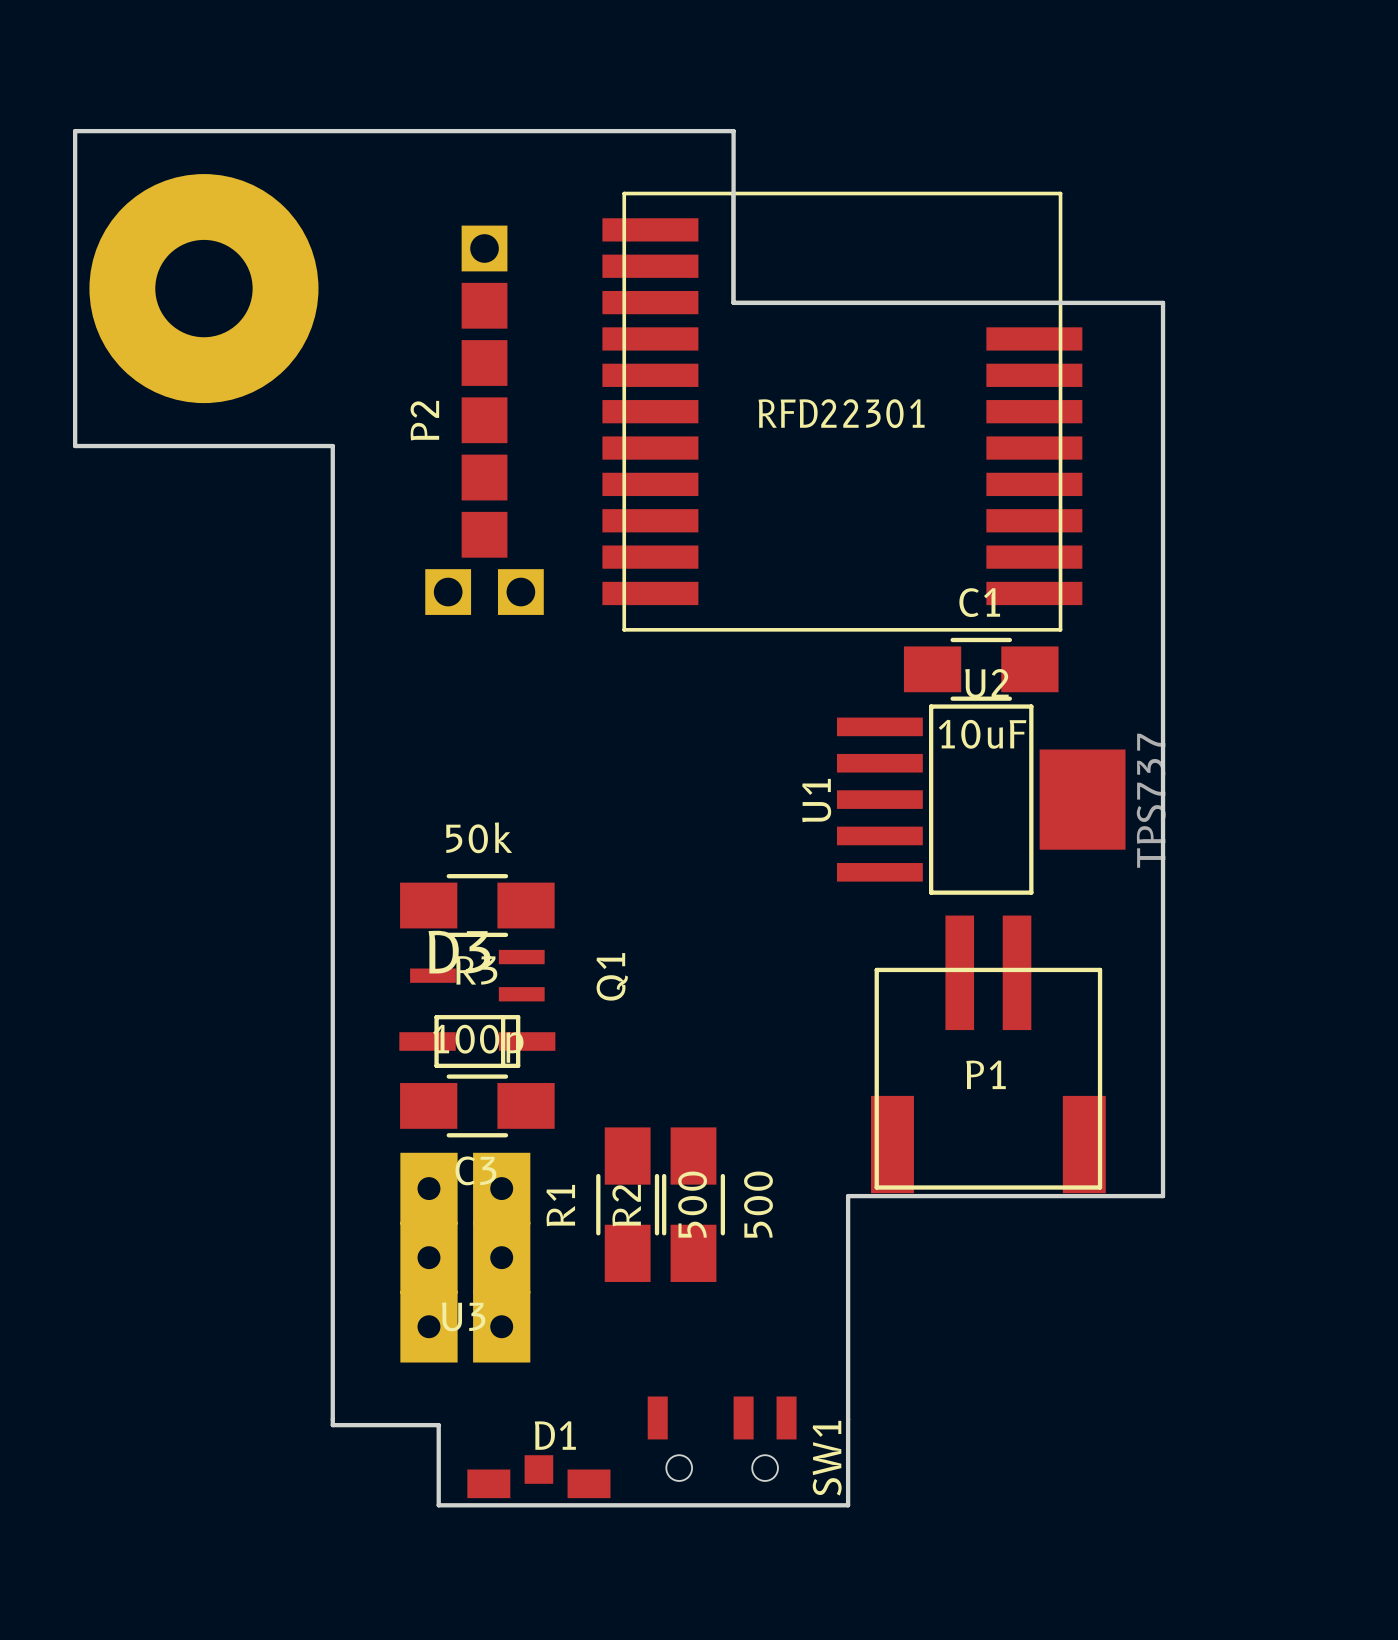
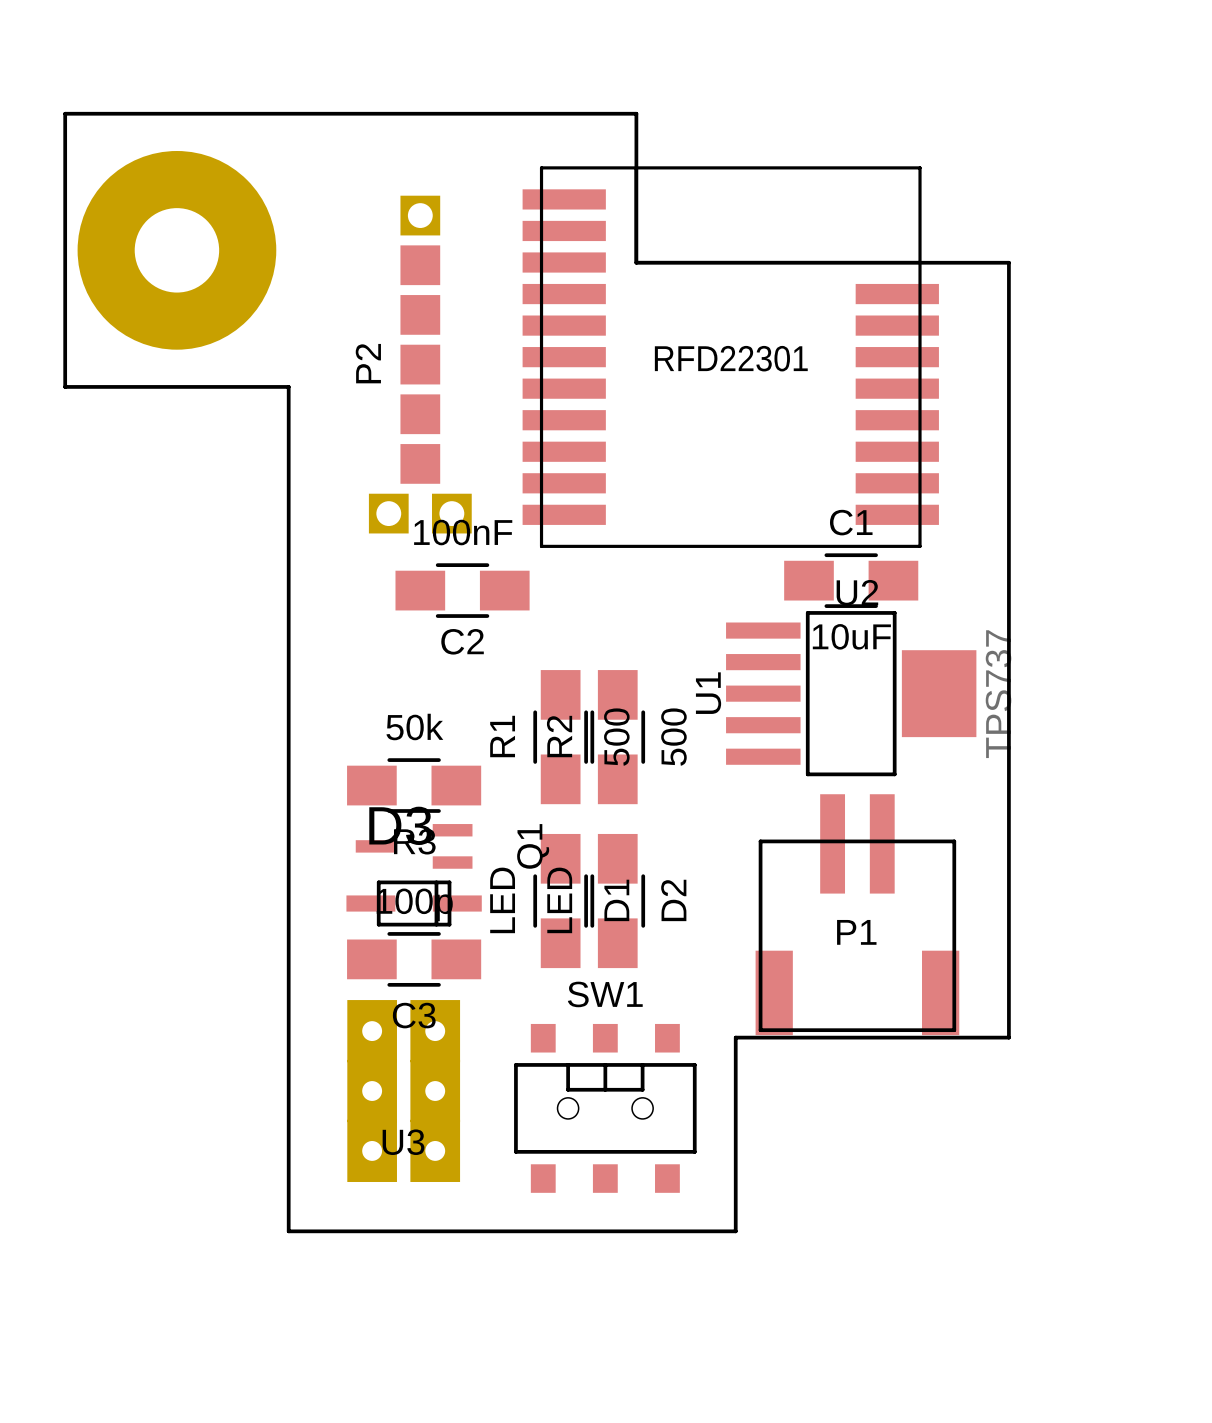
C2: none -> 100nF (462, 590)
D1 value: none -> LED (502, 900)
D2: none -> LED (617, 901)
R1 position: (627, 1204) -> (560, 737)
R2 position: (693, 1204) -> (617, 737)
SW1 footprint: [647, 1396, 797, 1481] -> [514, 1023, 697, 1193]
board edge: (332, 1419) (332, 1425) (438, 1425) (438, 1505) (848, 1505) (848, 1419) -> (288, 1231) (735, 1231)
D1 name position: D1 (555, 1435) -> D1 (616, 900)
D1 footprint: [467, 1455, 611, 1499] -> [533, 833, 588, 969]
SW1 name position: SW1 (827, 1458) -> SW1 (605, 994)

